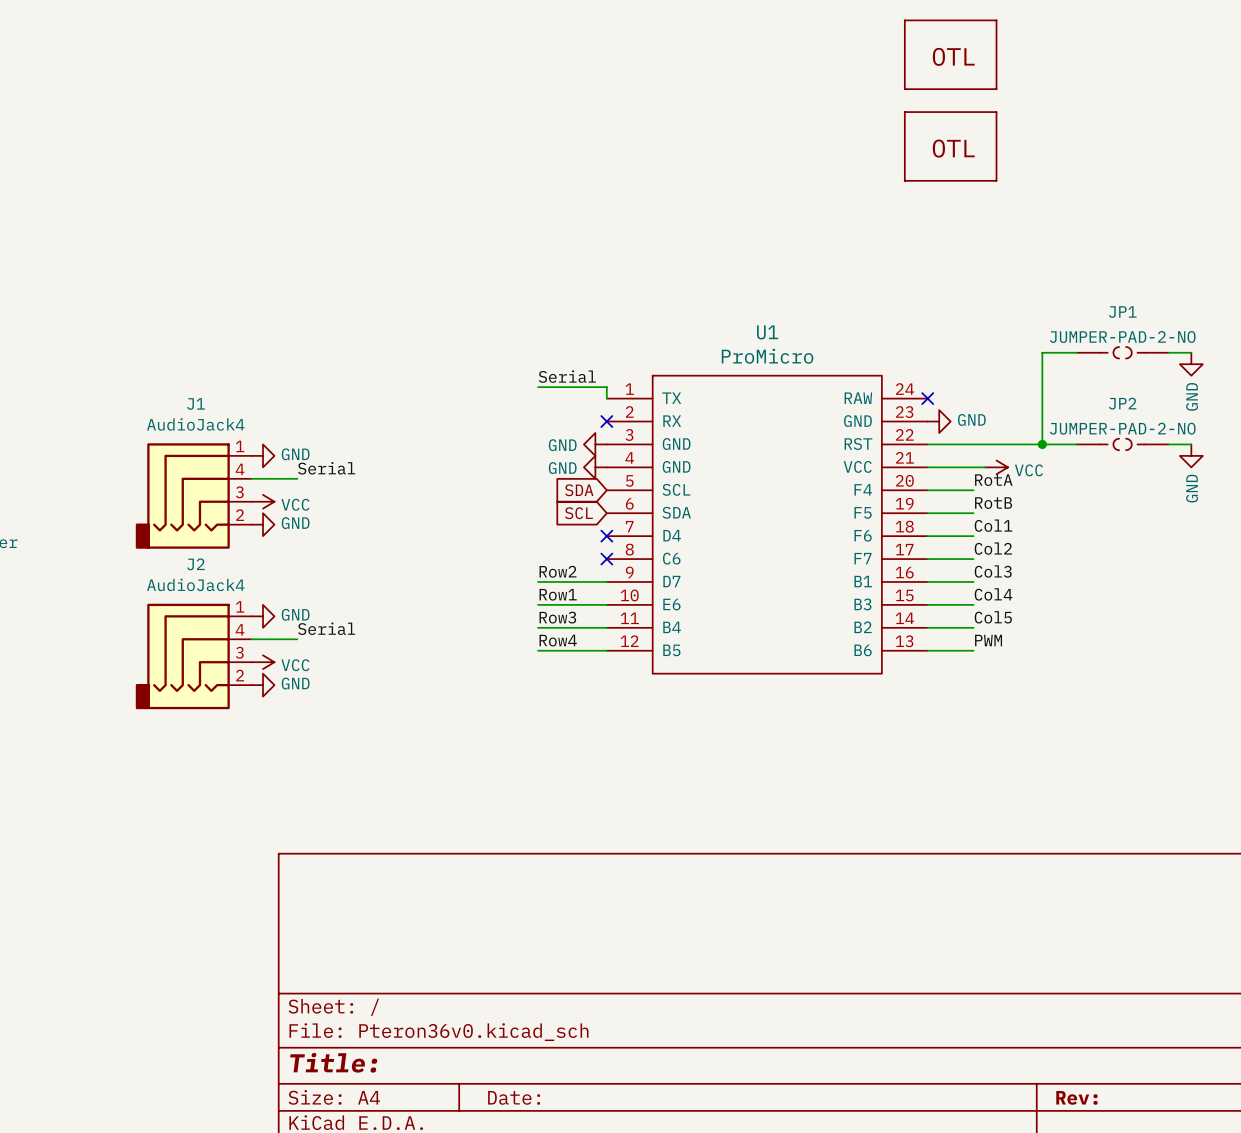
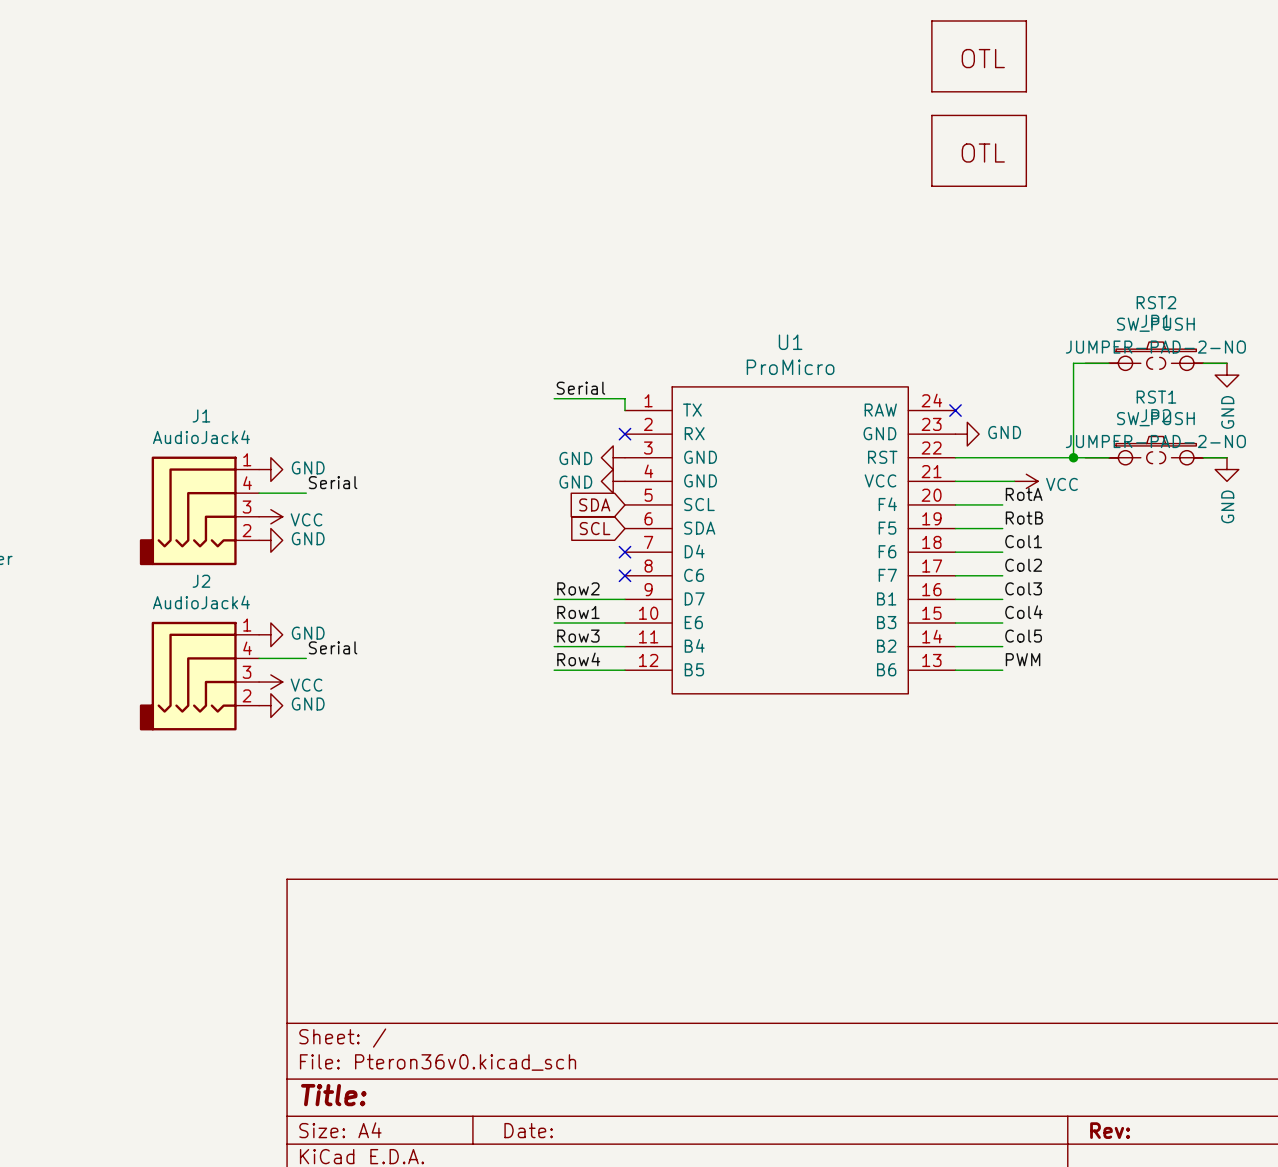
RST2: none -> SW_PUSH (1156, 356)
RST1: none -> SW_PUSH (1156, 450)

